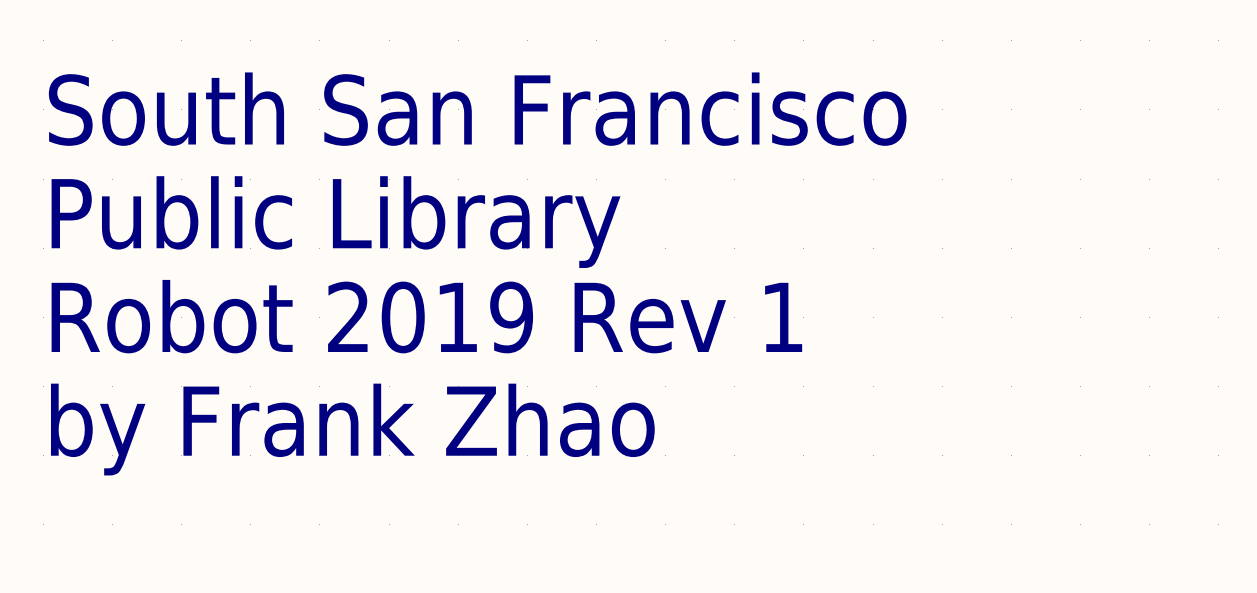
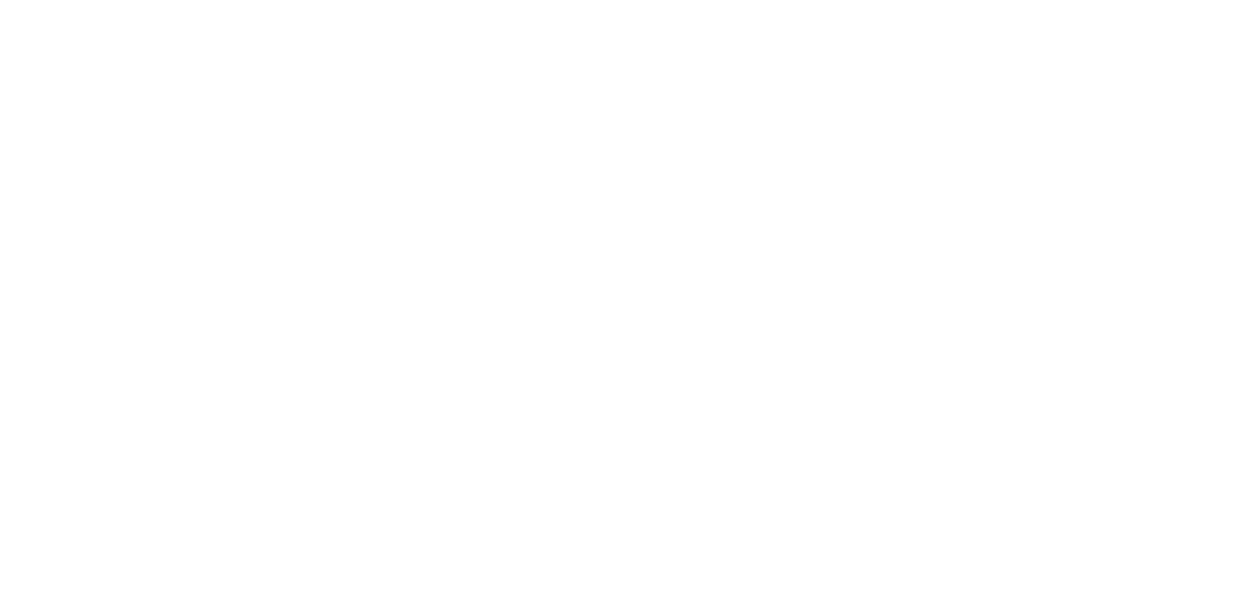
part: (477, 273) -> none

